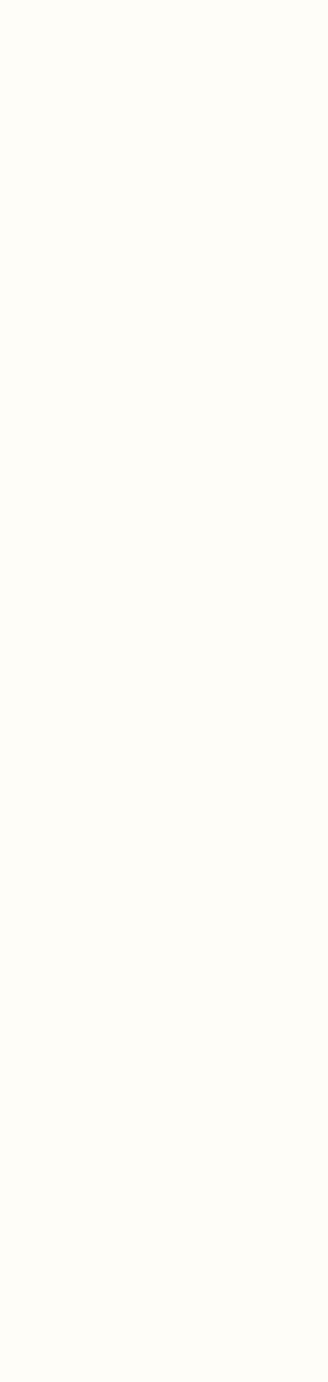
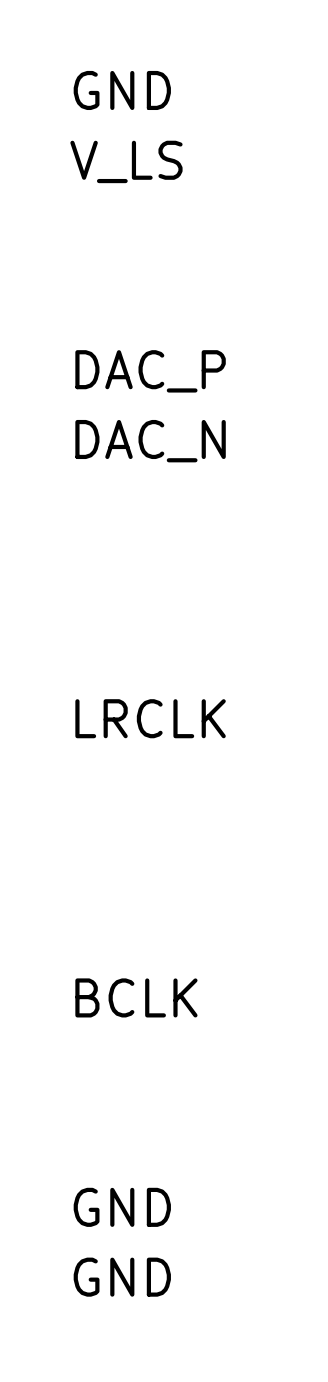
label: none -> GND (122, 90)
label: none -> V_LS (126, 161)
label: none -> DAC_P (150, 371)
label: none -> DAC_N (150, 441)
label: none -> LRCLK (150, 718)
label: none -> BCLK (136, 997)
label: none -> GND (122, 1207)
label: none -> GND (122, 1277)

